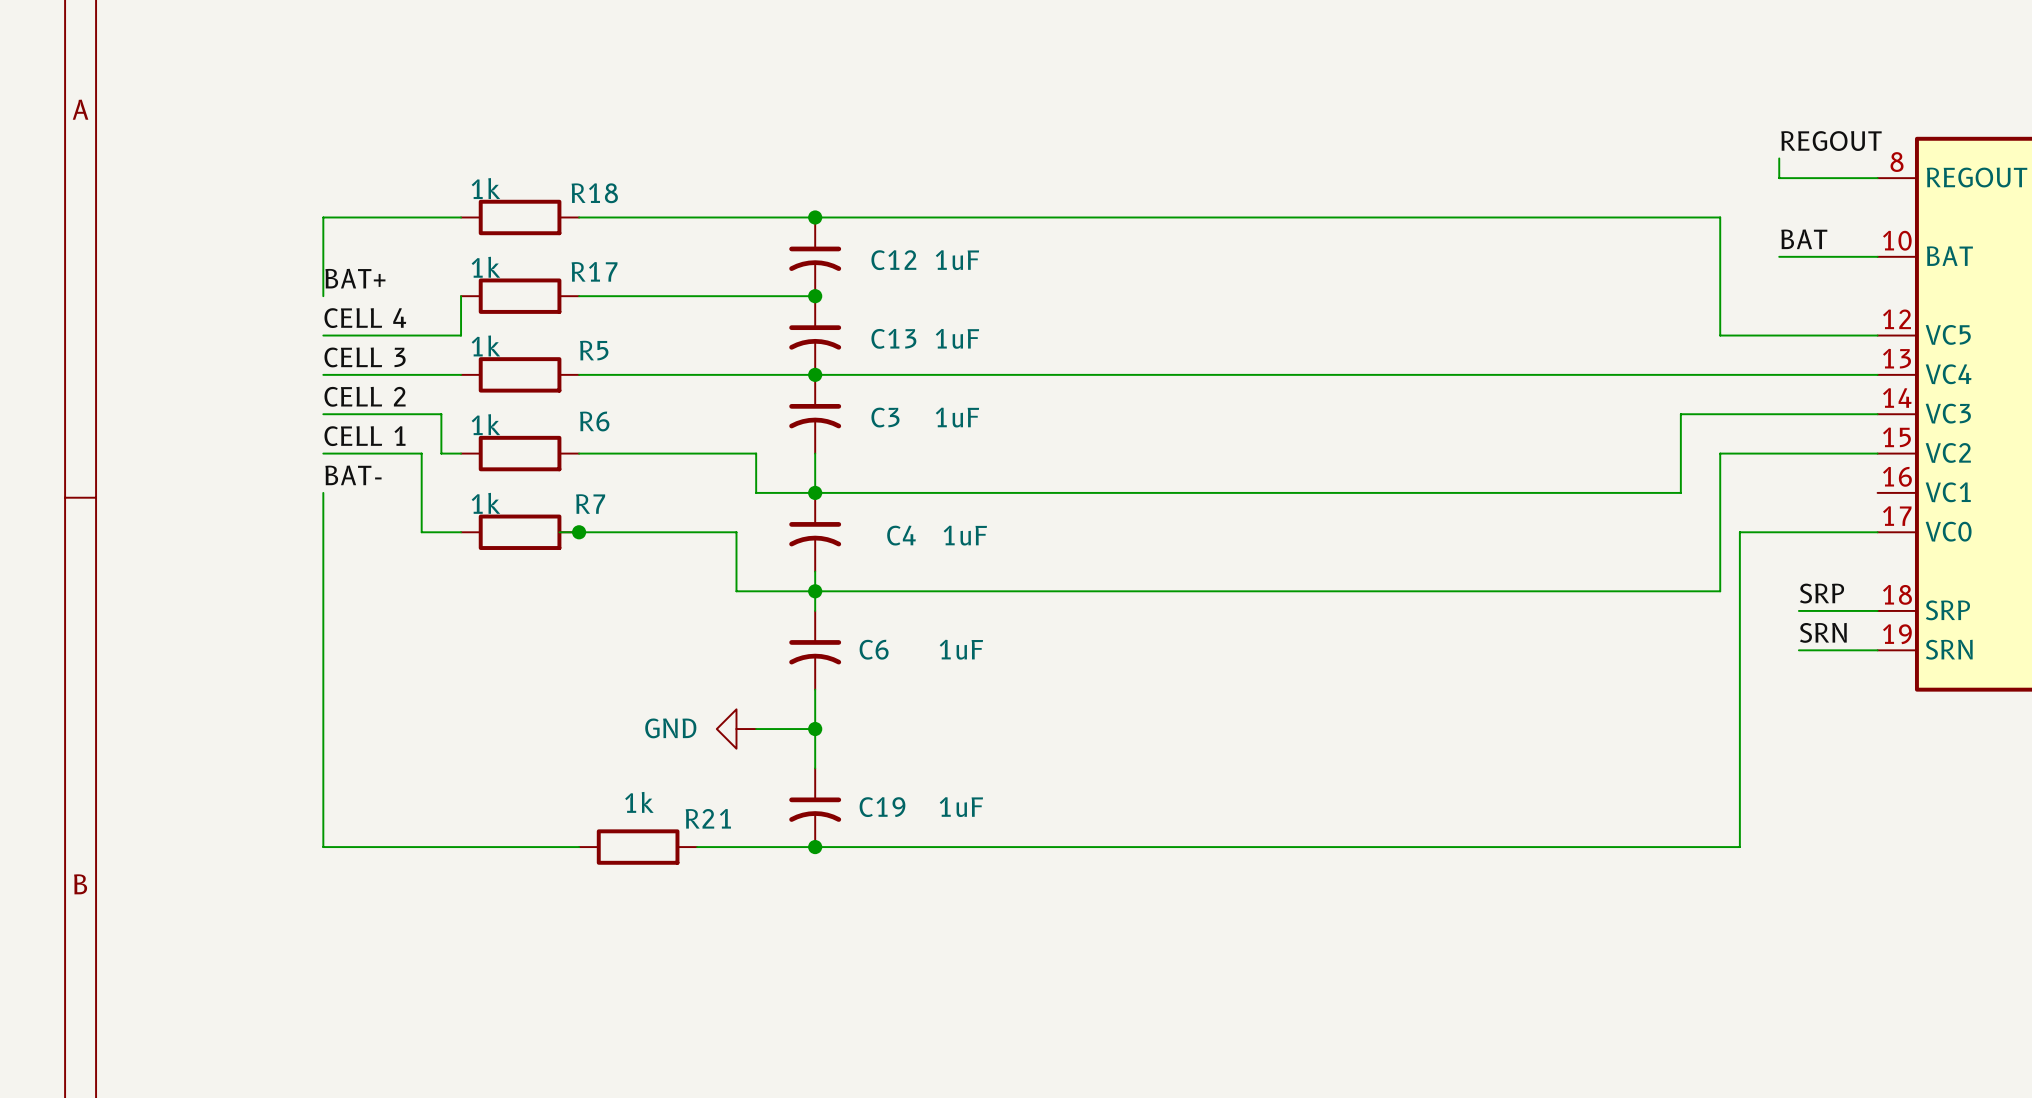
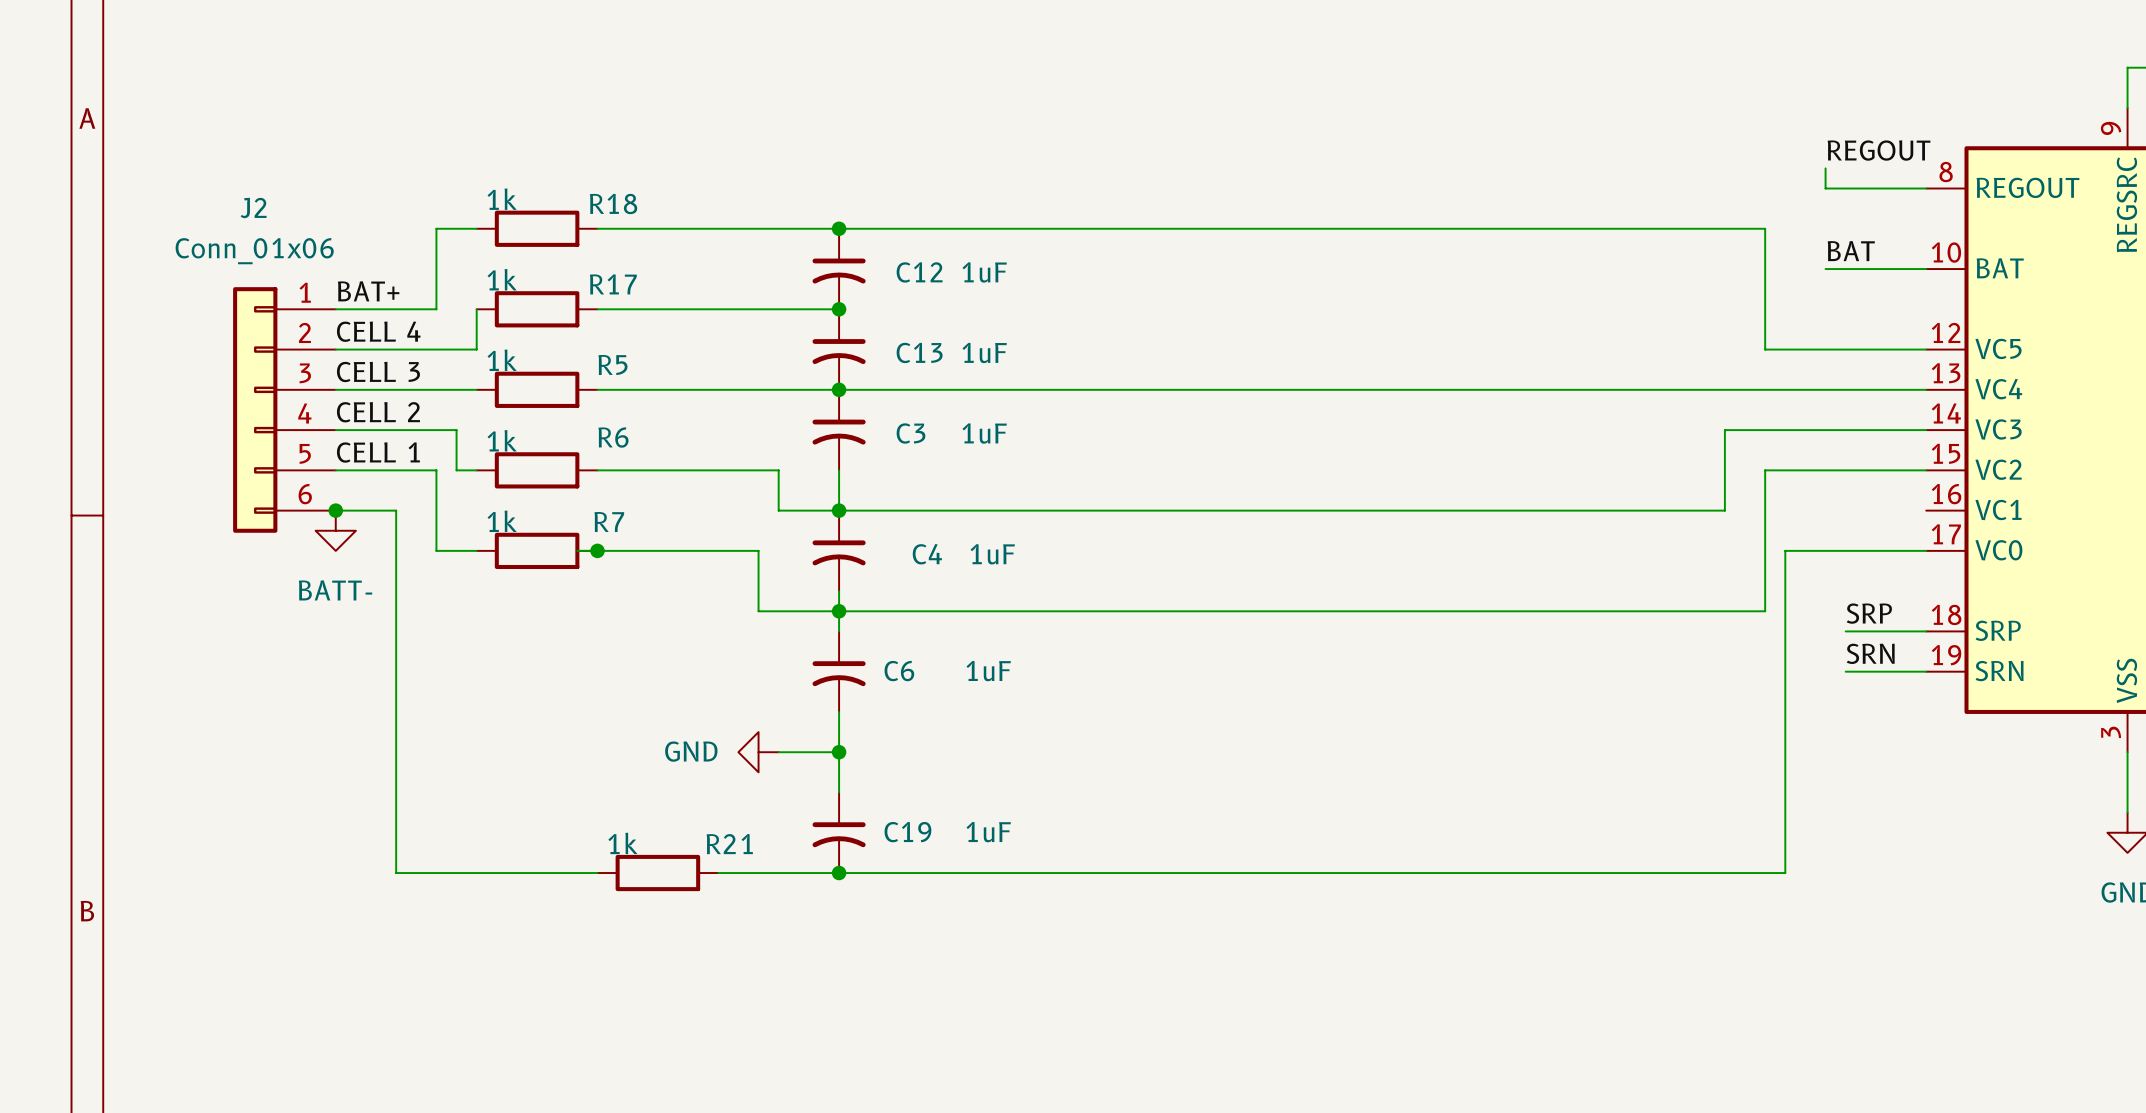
wire: (421, 217) (323, 217) (323, 296) -> (436, 228) (436, 309) (335, 309)
J2: none -> Conn_01x06 (284, 409)
label: BAT- (353, 475) -> none
wire: (323, 492) (323, 847) (382, 847) -> (335, 510) (396, 510) (396, 873)
junction: none -> (335, 510)
power symbol: none -> BATT- (335, 530)
R21 value position: 1k (639, 802) -> 1k (622, 843)

